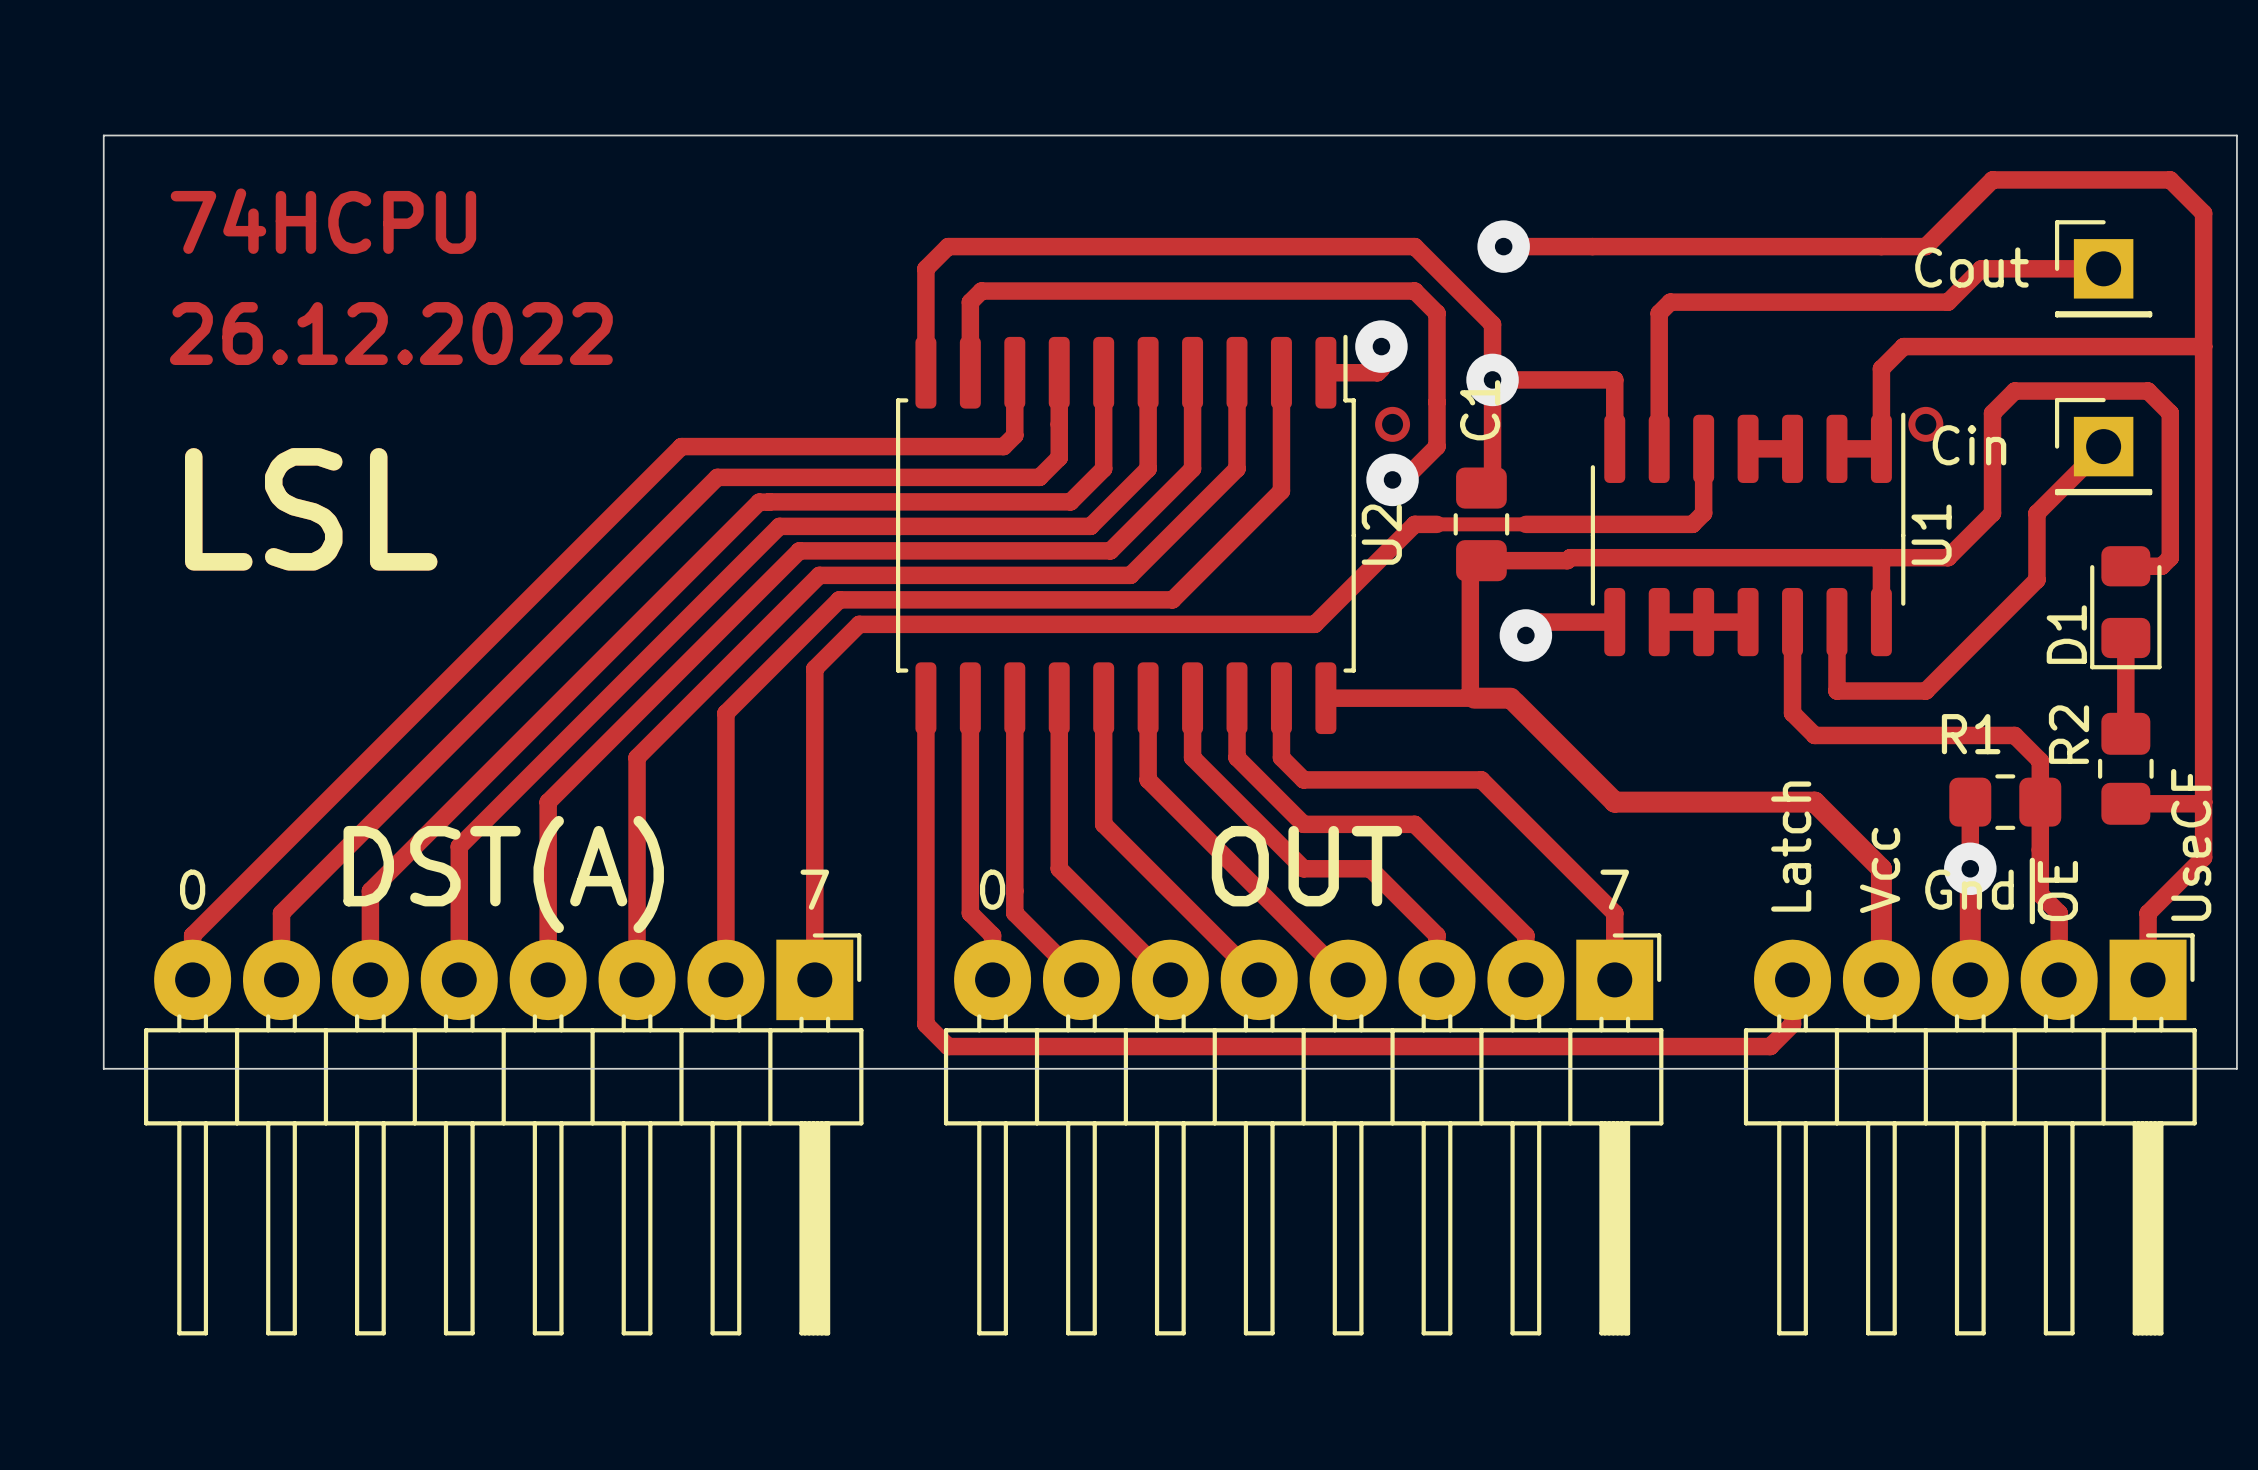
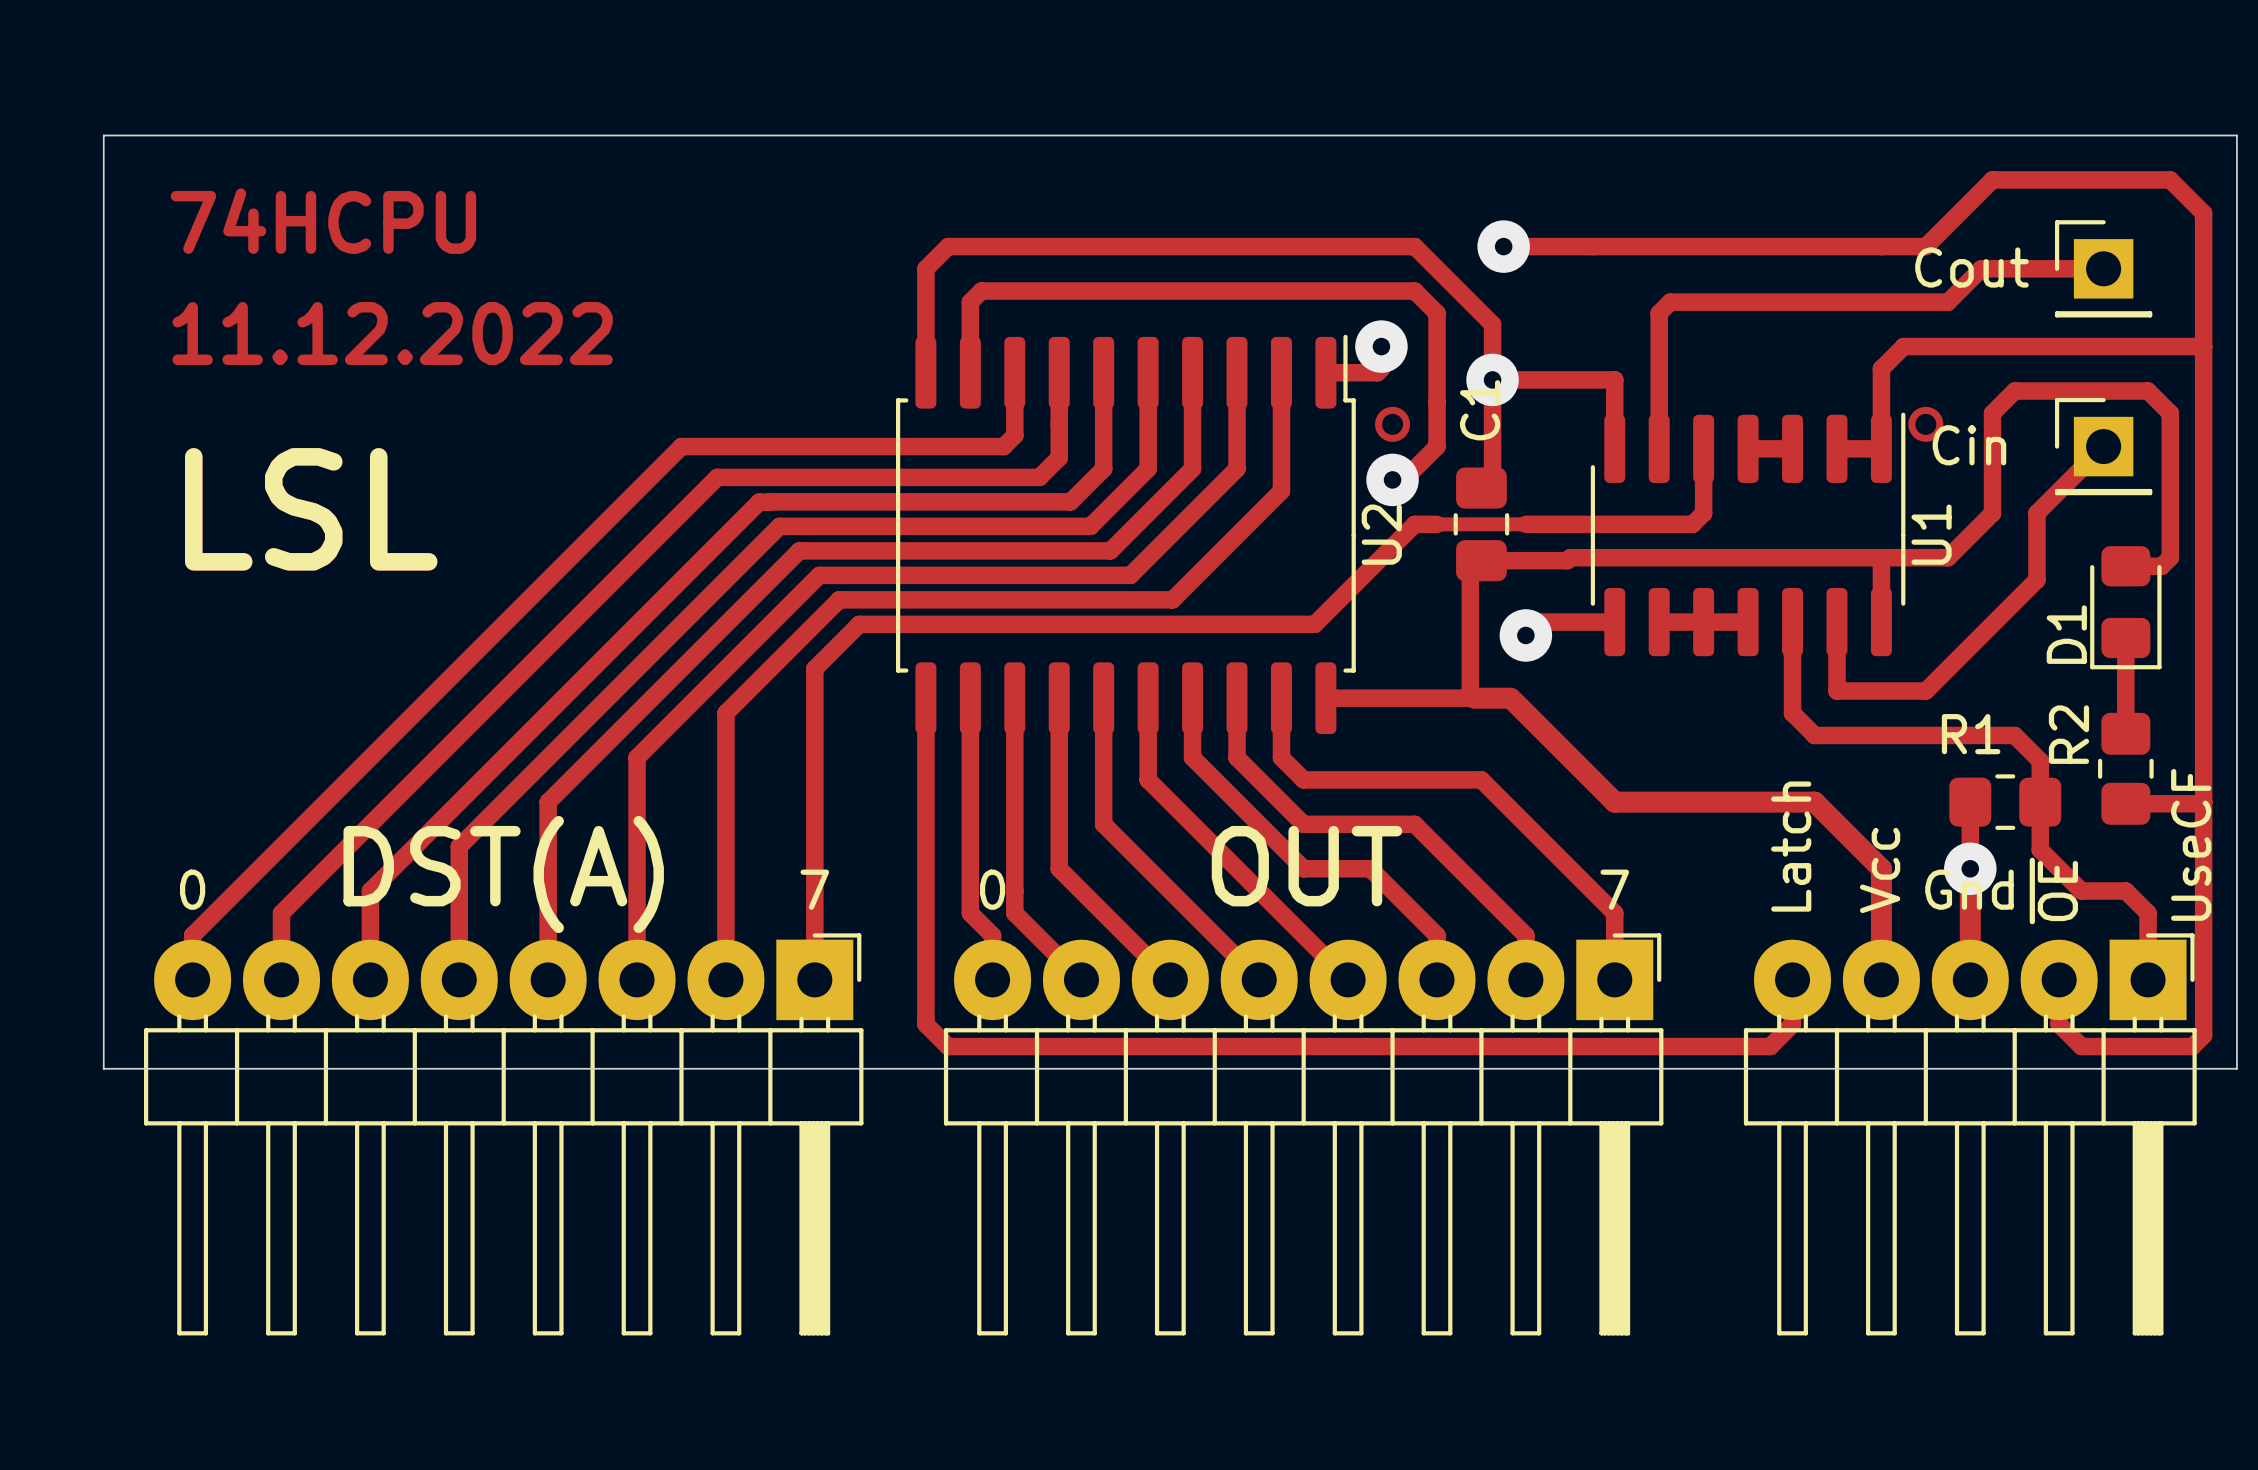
text: 26.12.2022 (391, 333) -> 11.12.2022 (392, 333)
track: (2040, 849) (2040, 894) (2059, 913) (2059, 979) -> (2040, 849) (2081, 891) (2125, 891) (2148, 913)
track: (2203, 857) (2148, 913) -> (2203, 857) (2203, 1035) (2192, 1046) (2081, 1046) (2059, 1024) (2059, 979)

